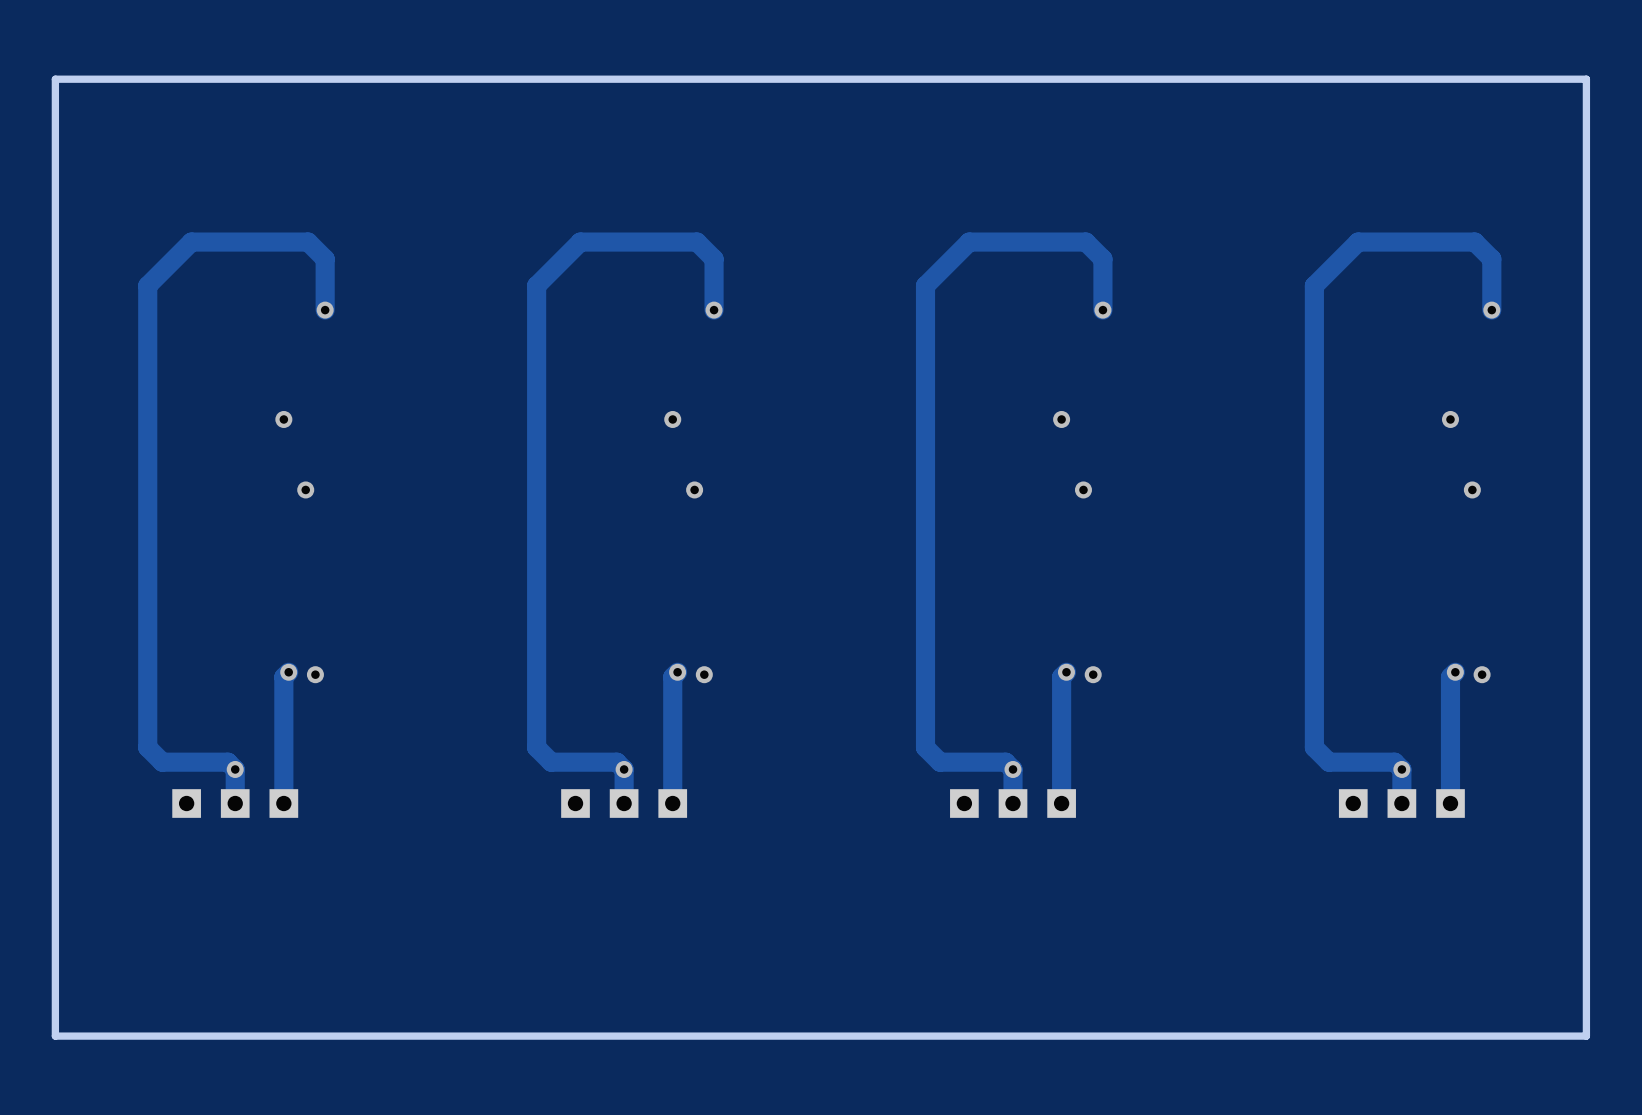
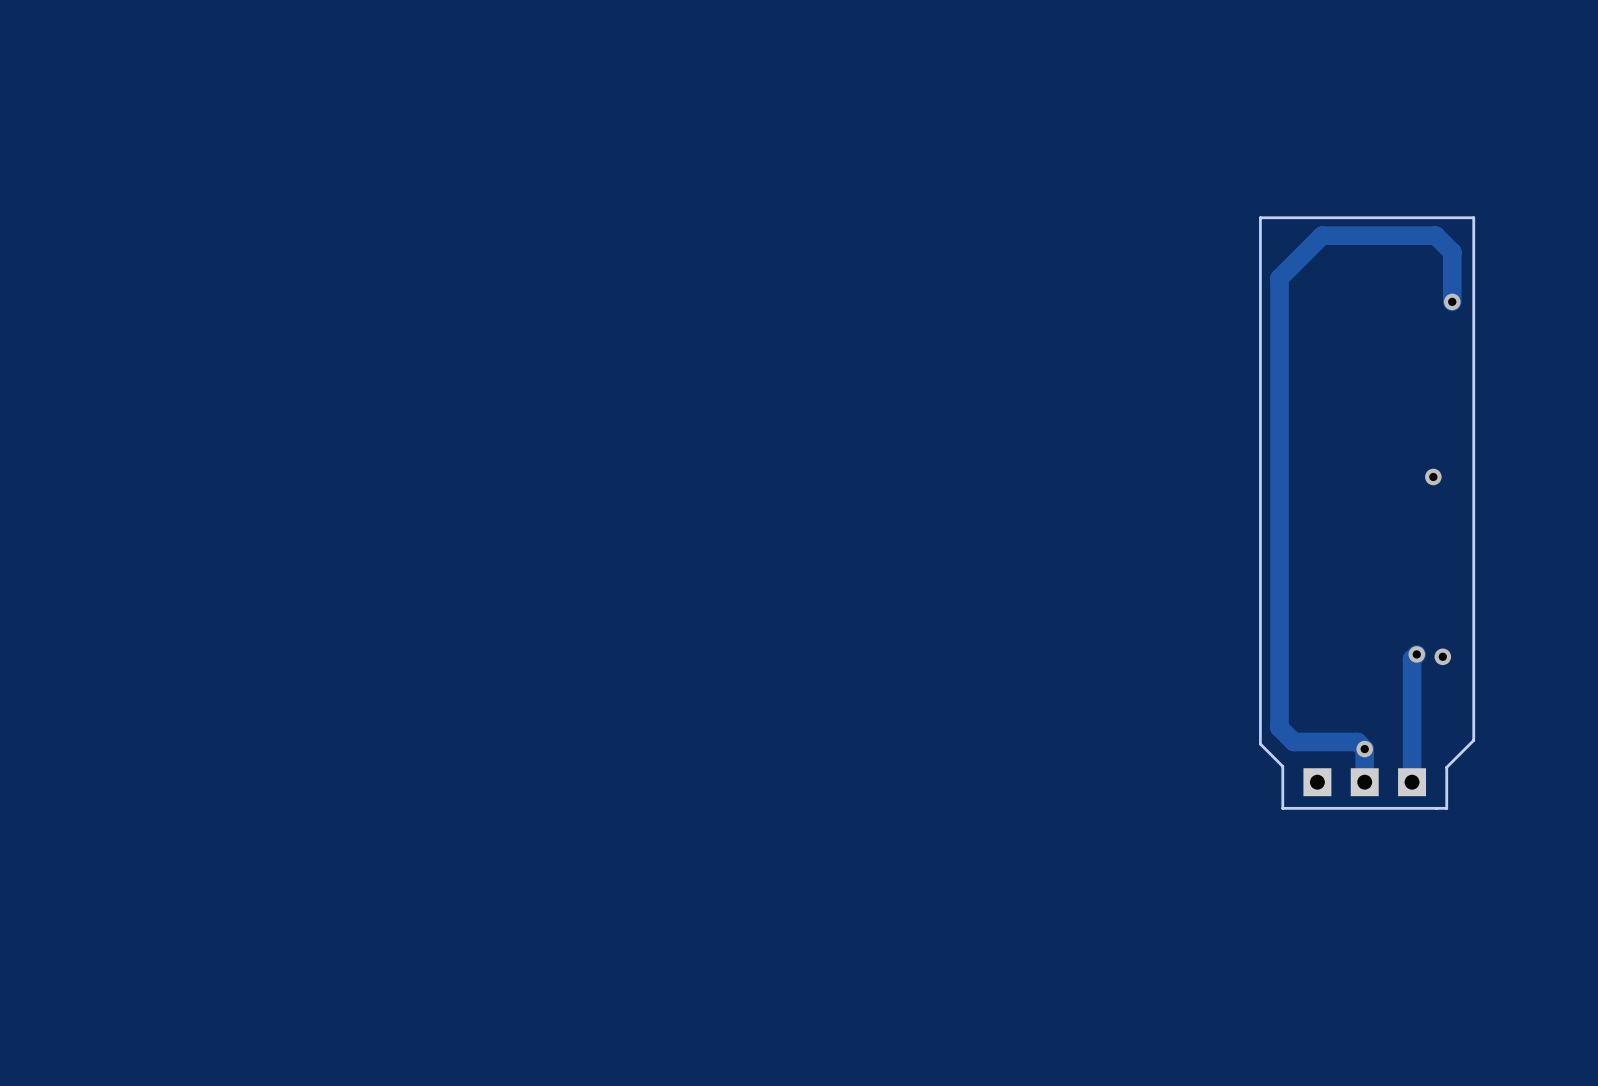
drawing: [51, 75, 1591, 1040] -> none
board edge: none -> (1473, 217) (1260, 217) (1260, 744) (1282, 766) (1282, 808) (1446, 808) (1446, 767) (1473, 740) (1473, 217)
track: (325, 310) (325, 259) (308, 242) (191, 242) (147, 285) (147, 747) (162, 762) (227, 762) (235, 769) (235, 803) -> none
via: (325, 310) -> none
track: (714, 310) (714, 259) (697, 242) (580, 242) (536, 285) (536, 747) (551, 762) (616, 762) (624, 769) (624, 803) -> none
via: (714, 310) -> none
track: (1102, 310) (1102, 259) (1085, 242) (969, 242) (925, 285) (925, 747) (940, 762) (1005, 762) (1013, 769) (1013, 803) -> none
via: (1102, 310) -> none
via: (283, 419) -> none
via: (672, 419) -> none
via: (1061, 419) -> none
via: (1450, 419) -> none
via: (305, 489) -> none
via: (694, 489) -> none
via: (1083, 489) -> none
track: (288, 672) (283, 677) (283, 803) -> none
via: (288, 672) -> none
track: (677, 672) (672, 677) (672, 803) -> none
via: (677, 672) -> none
track: (1066, 672) (1061, 677) (1061, 803) -> none
via: (1066, 672) -> none
via: (315, 674) -> none
via: (704, 674) -> none
via: (1093, 674) -> none
via: (235, 769) -> none
via: (624, 769) -> none
via: (1013, 769) -> none
part: (186, 803) -> none
part: (235, 803) -> none
part: (283, 803) -> none
part: (575, 803) -> none
part: (624, 803) -> none
part: (672, 803) -> none
part: (964, 803) -> none
part: (1013, 803) -> none
part: (1061, 803) -> none

